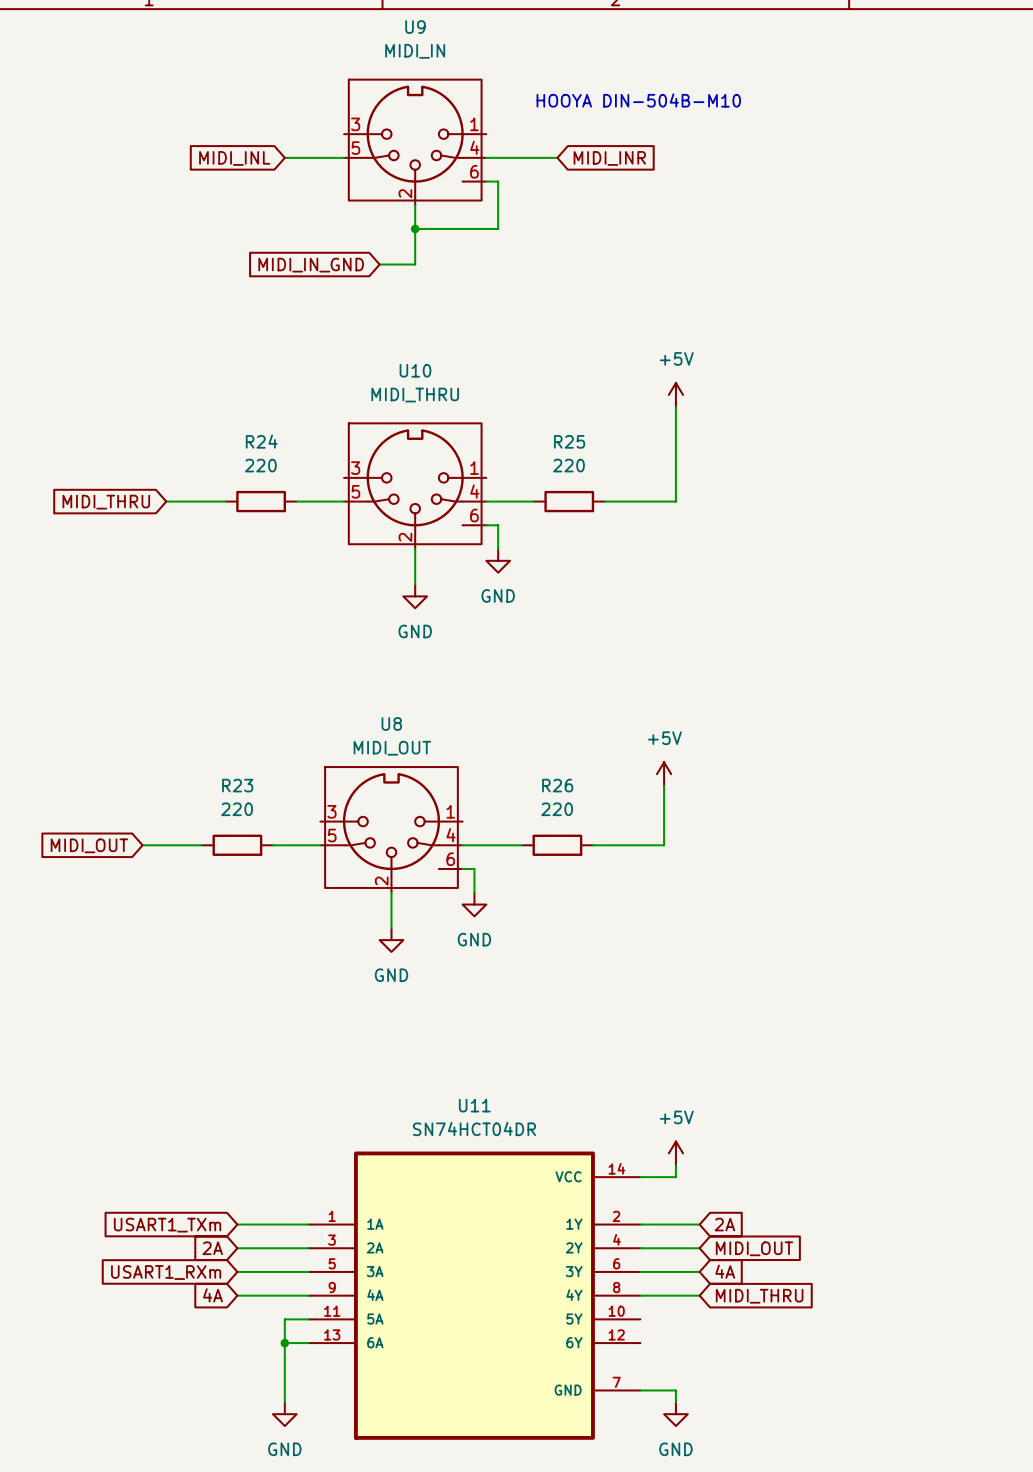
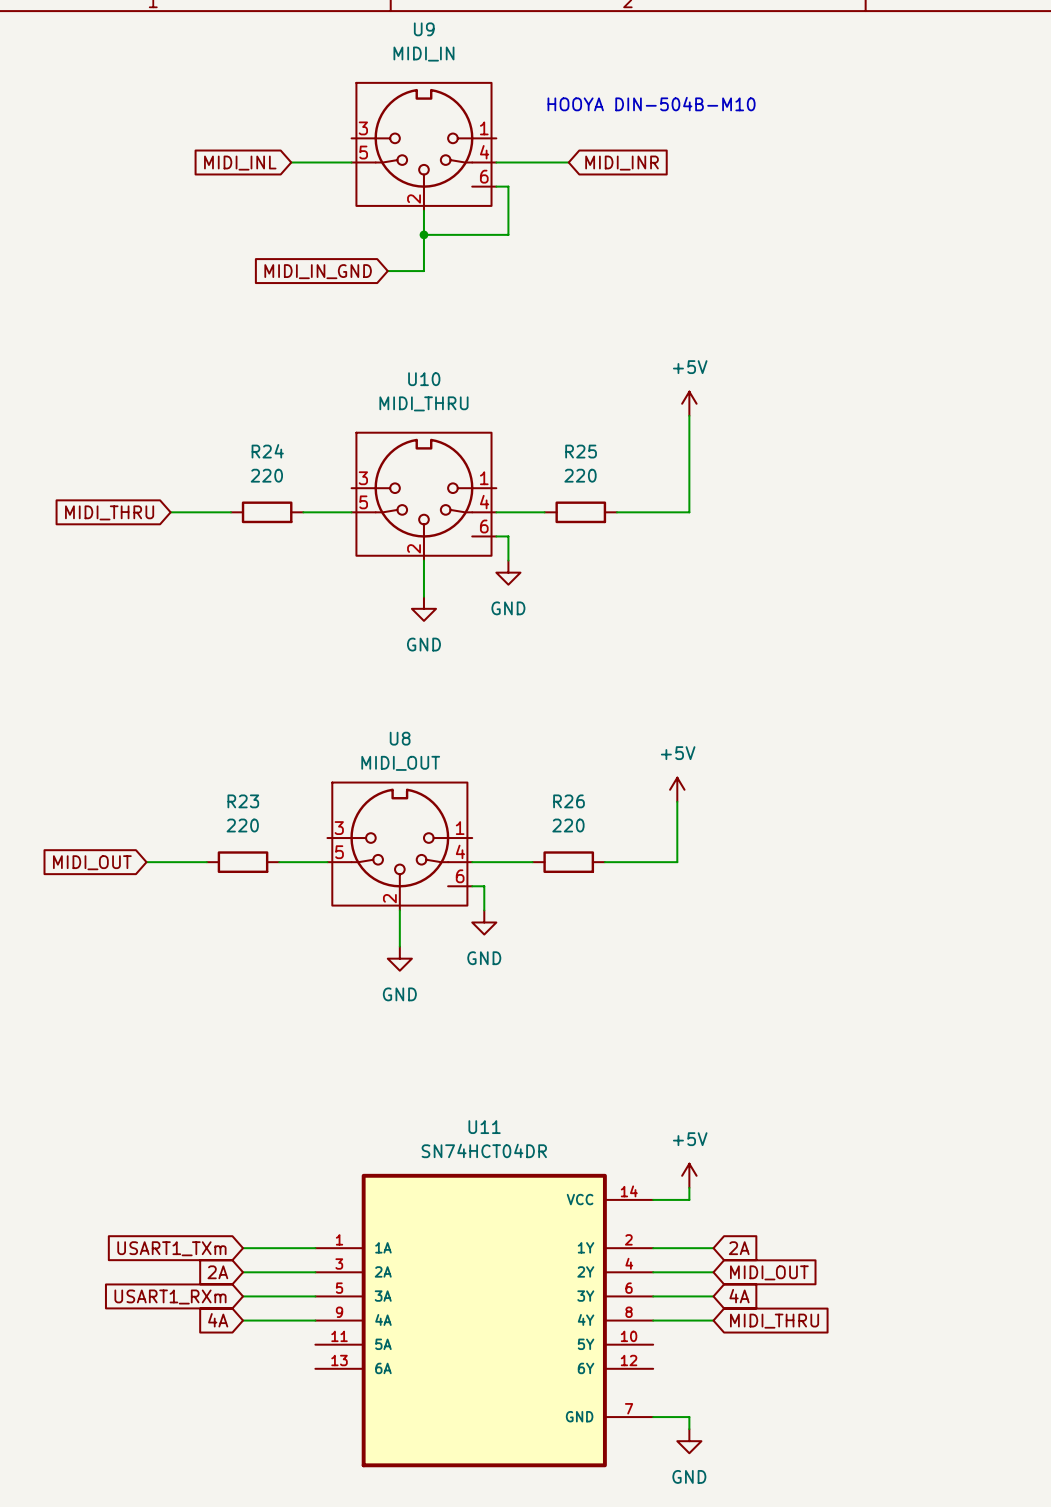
wire: (308, 1319) (284, 1319) (284, 1402) -> none
wire: (284, 1343) (308, 1343) -> none
junction: (284, 1343) -> none
power symbol: GND (284, 1414) -> none

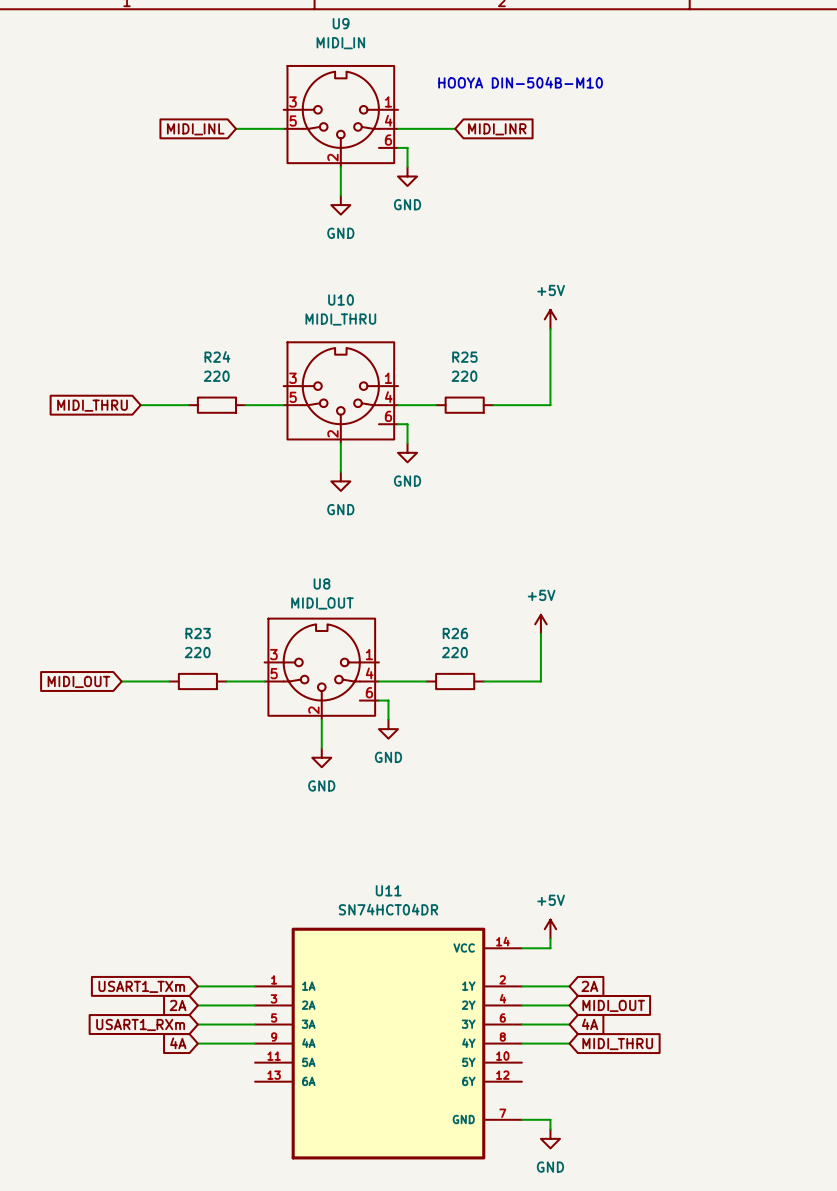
wire: (508, 210) (508, 234) (423, 234) -> none
power symbol: none -> GND (407, 176)
junction: (423, 234) -> none
wire: (423, 246) (423, 271) (387, 271) -> none
power symbol: none -> GND (340, 205)
global label: MIDI_IN_GND (318, 271) -> none

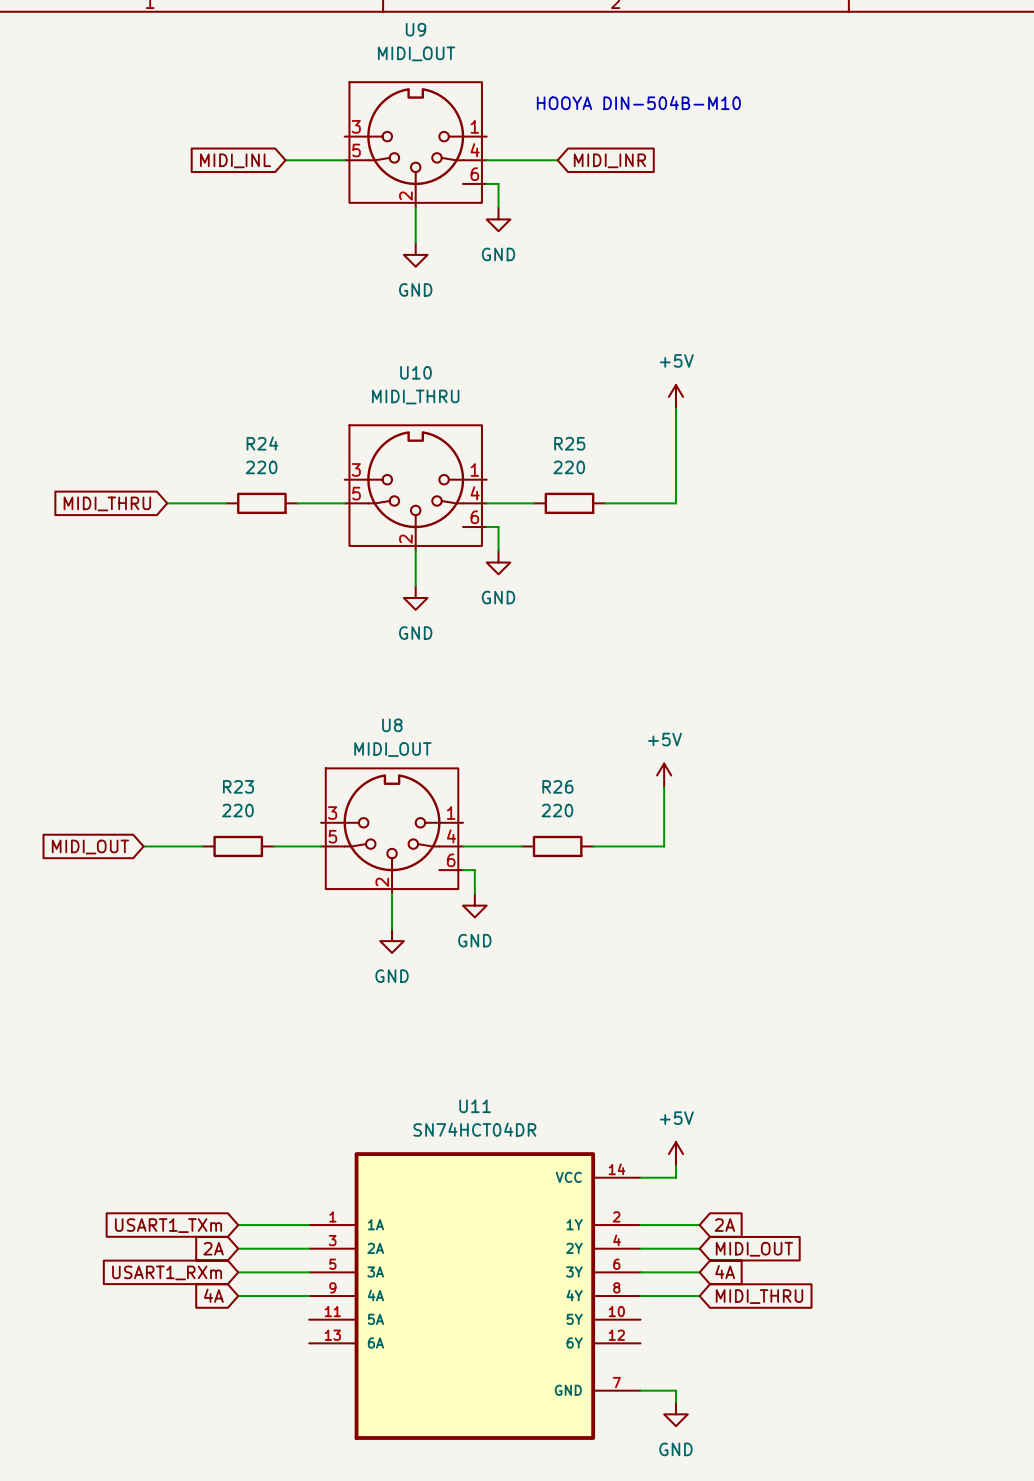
U9 value: MIDI_IN (340, 43) -> MIDI_OUT (416, 53)

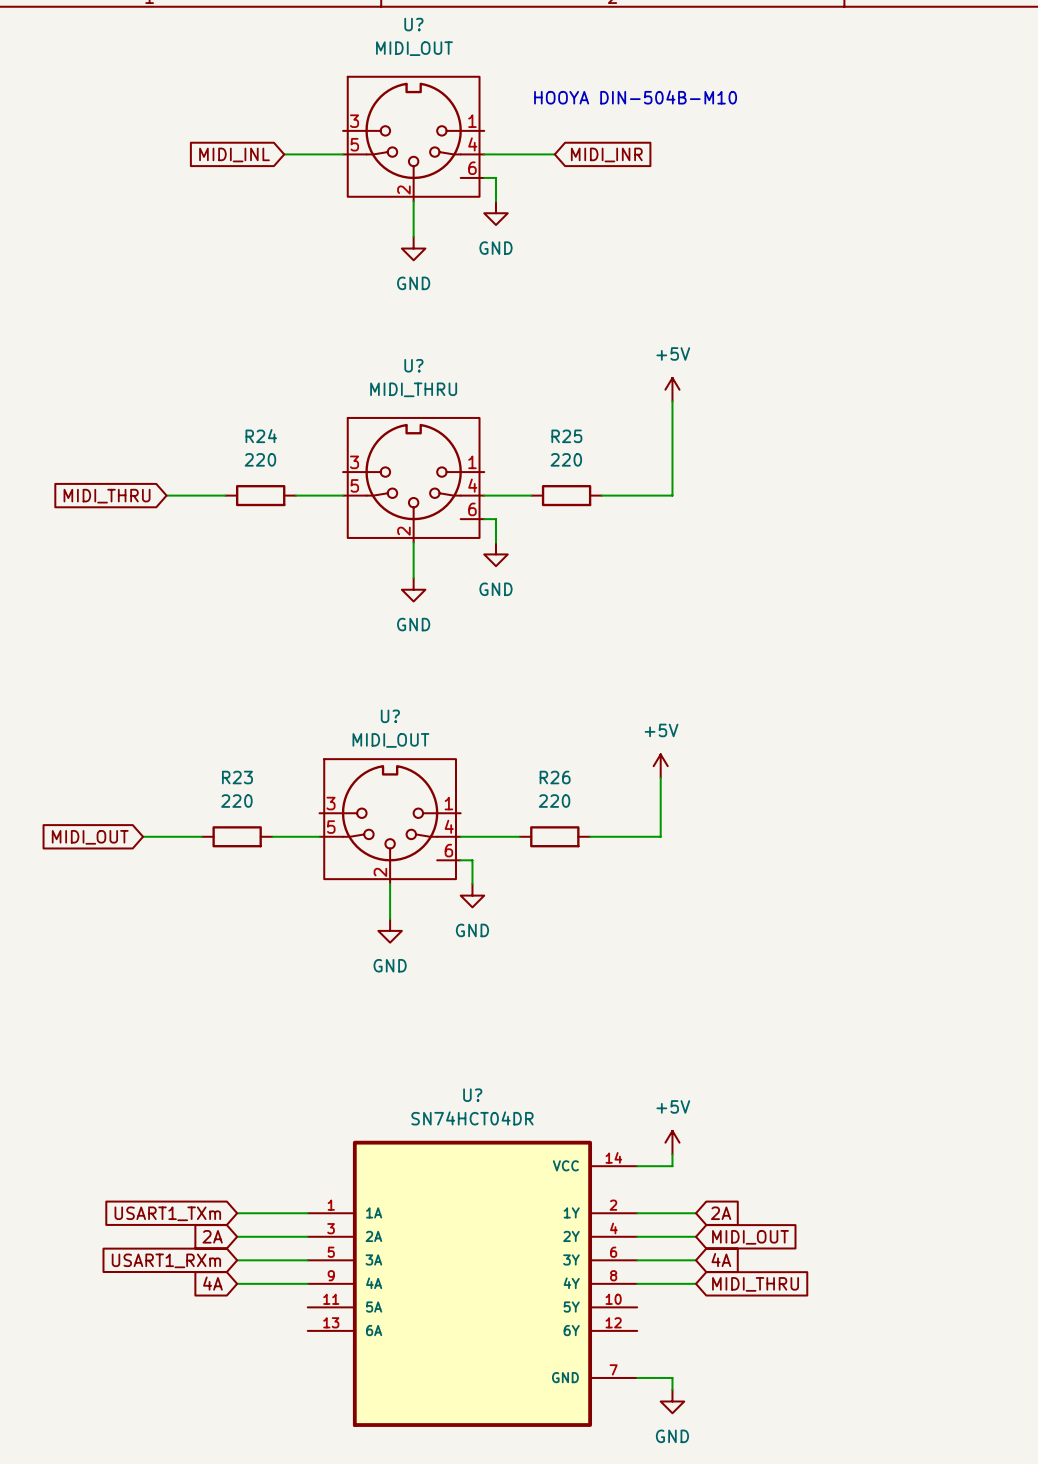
U9 name: U9 (415, 29) -> U? (413, 24)
U10 name: U10 (415, 372) -> U? (413, 365)
U8 name: U8 (392, 725) -> U? (390, 716)
U11 name: U11 (475, 1106) -> U? (472, 1095)

